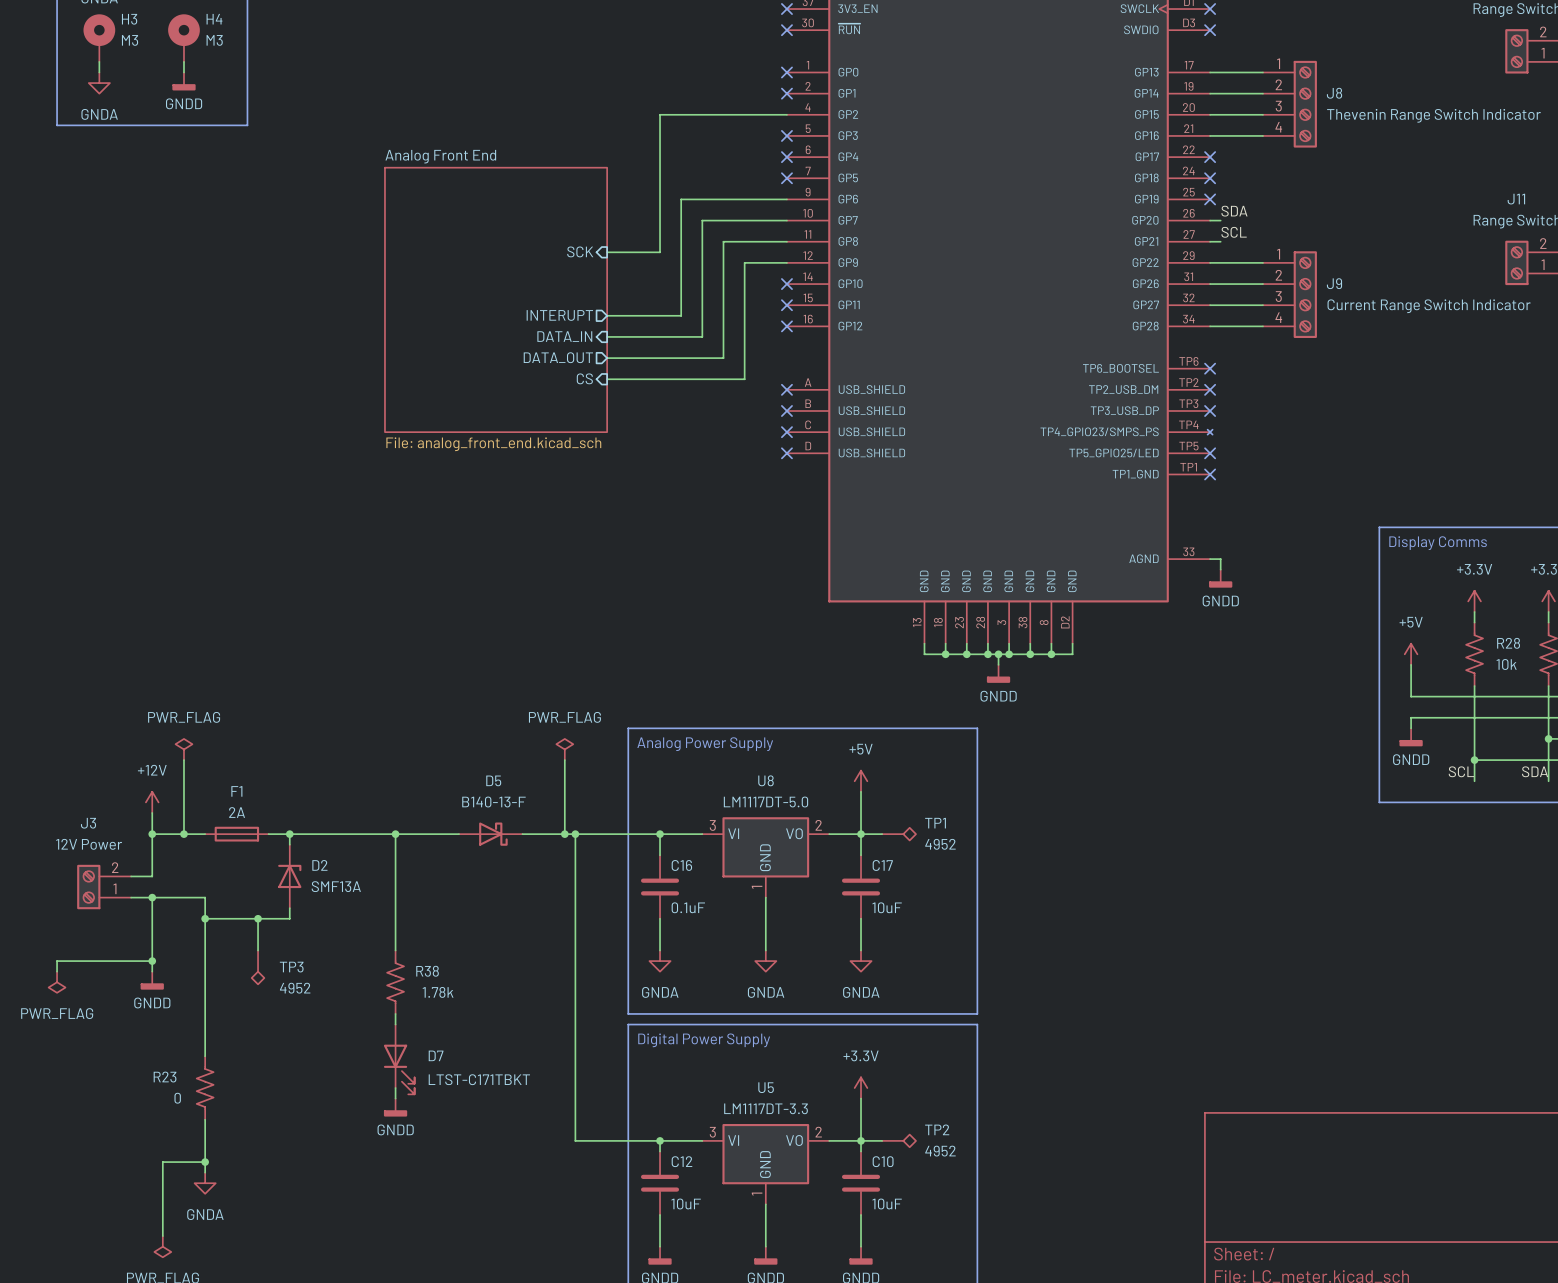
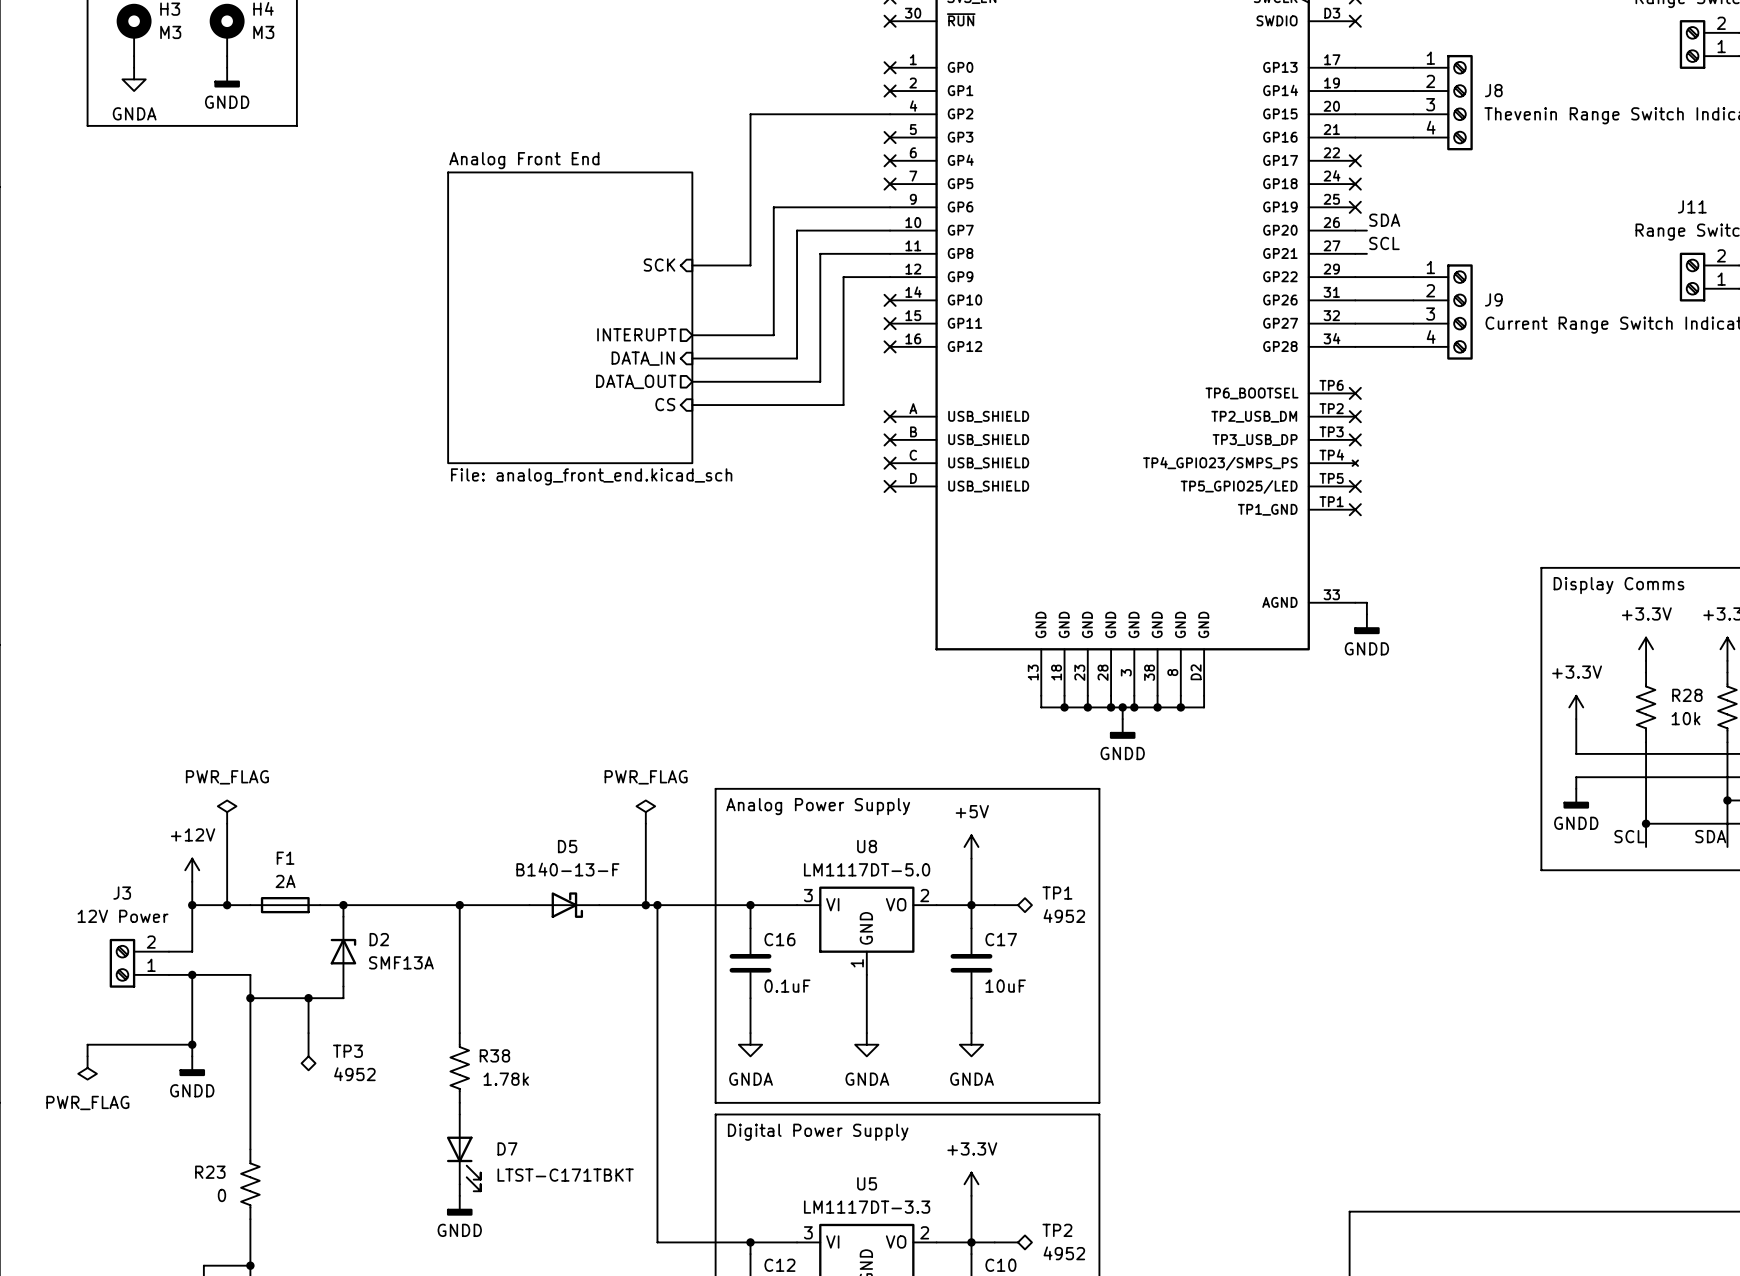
power symbol: +5V (1411, 654) -> +3.3V (1576, 707)

